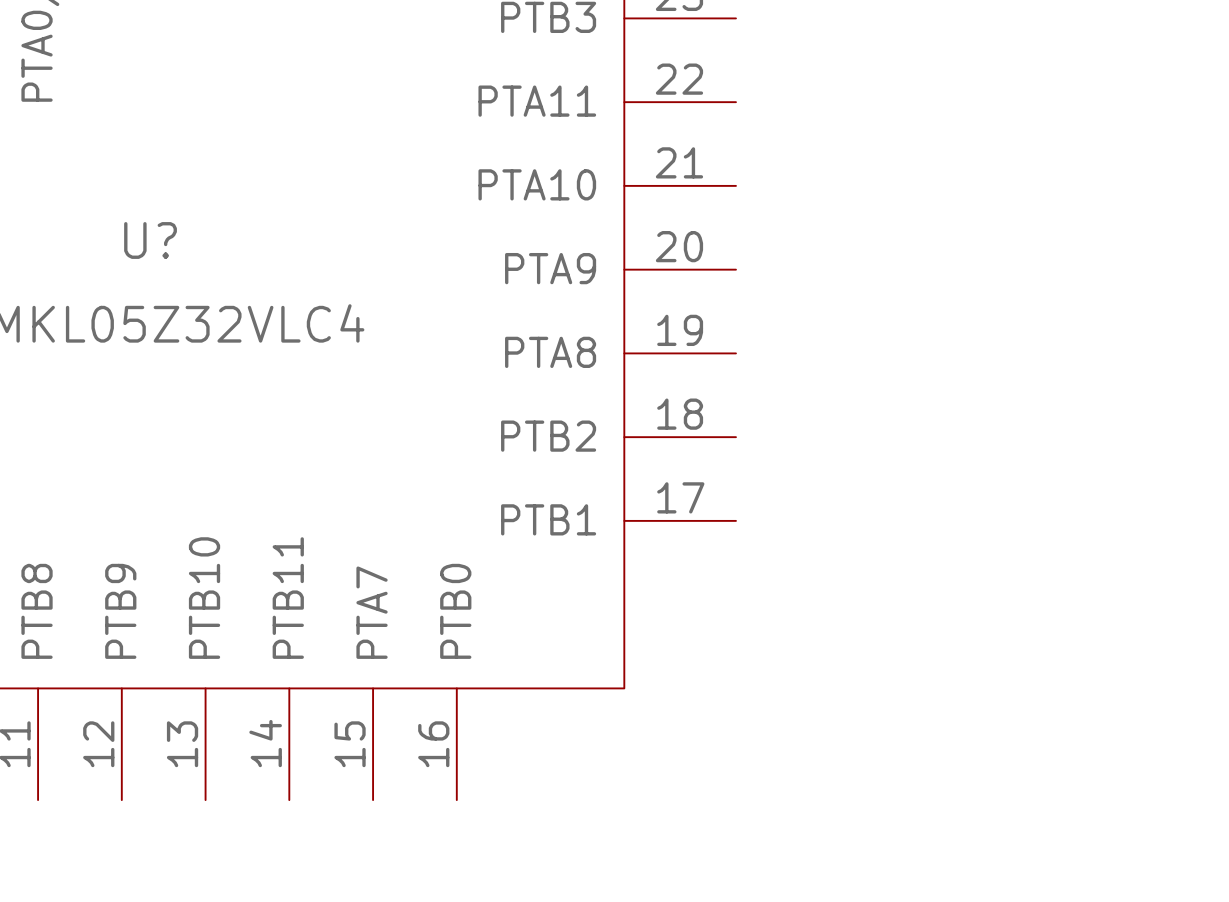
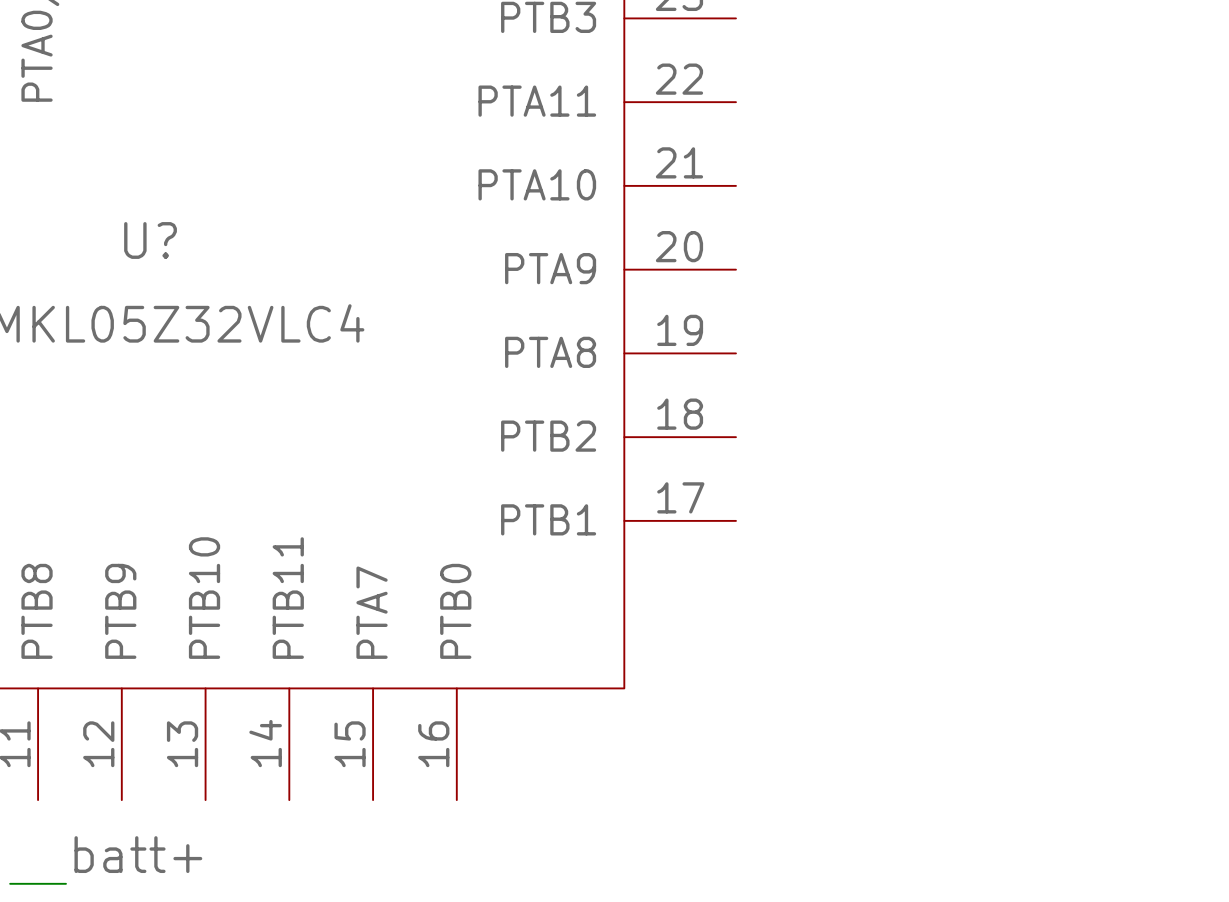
label: none -> batt+ (138, 854)
wire: none -> (10, 883) (65, 883)

